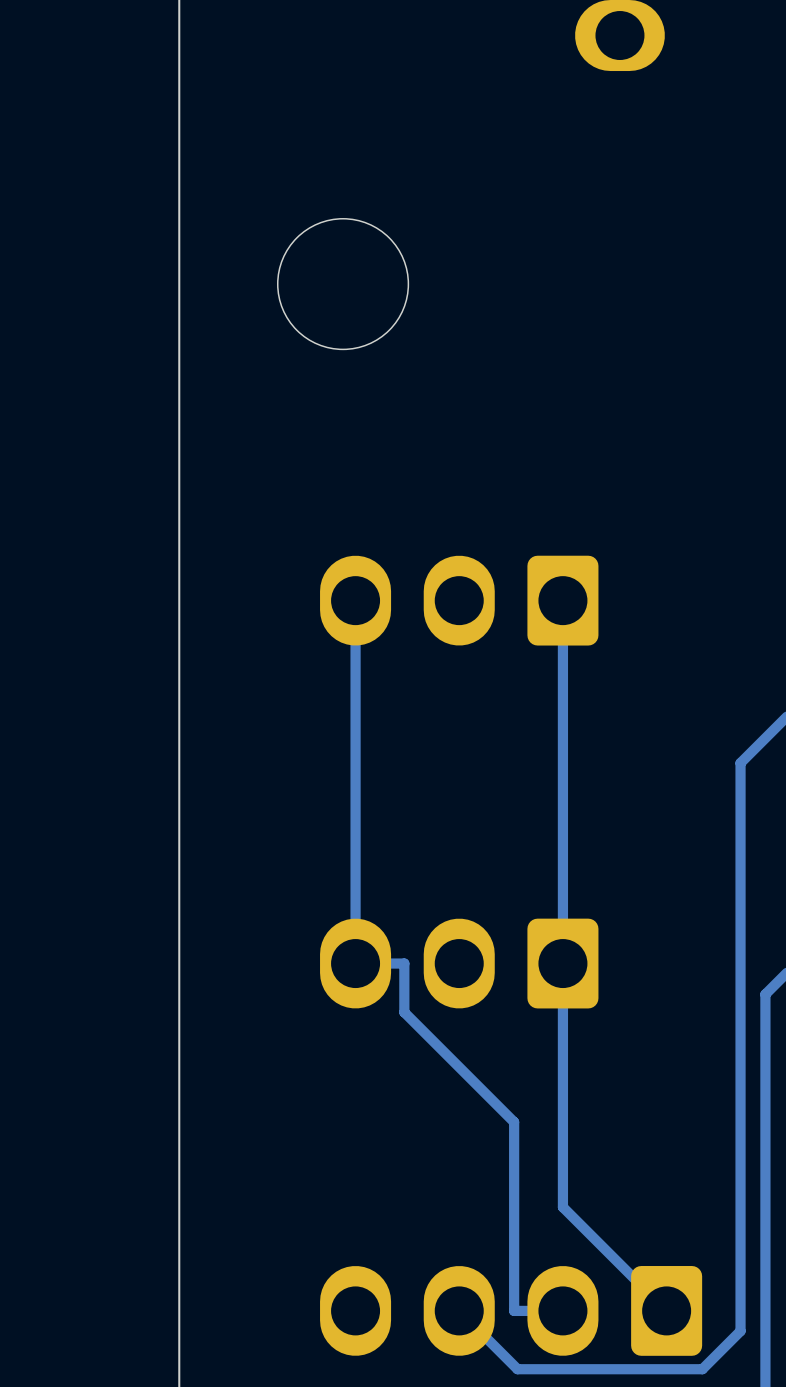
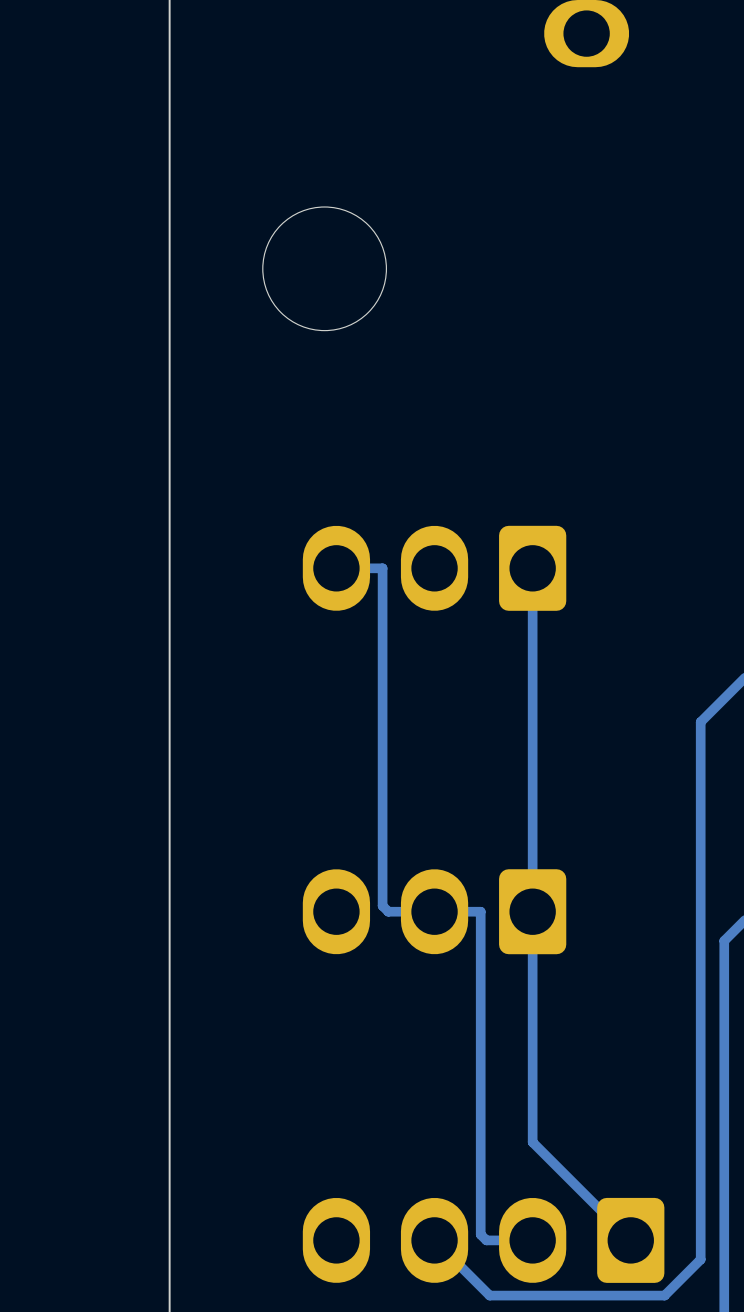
track: (355, 600) (355, 963) (404, 963) (404, 1012) (514, 1122) (514, 1310) -> (336, 568) (382, 568) (382, 905) (388, 911) (480, 911) (480, 1234) (486, 1240)

